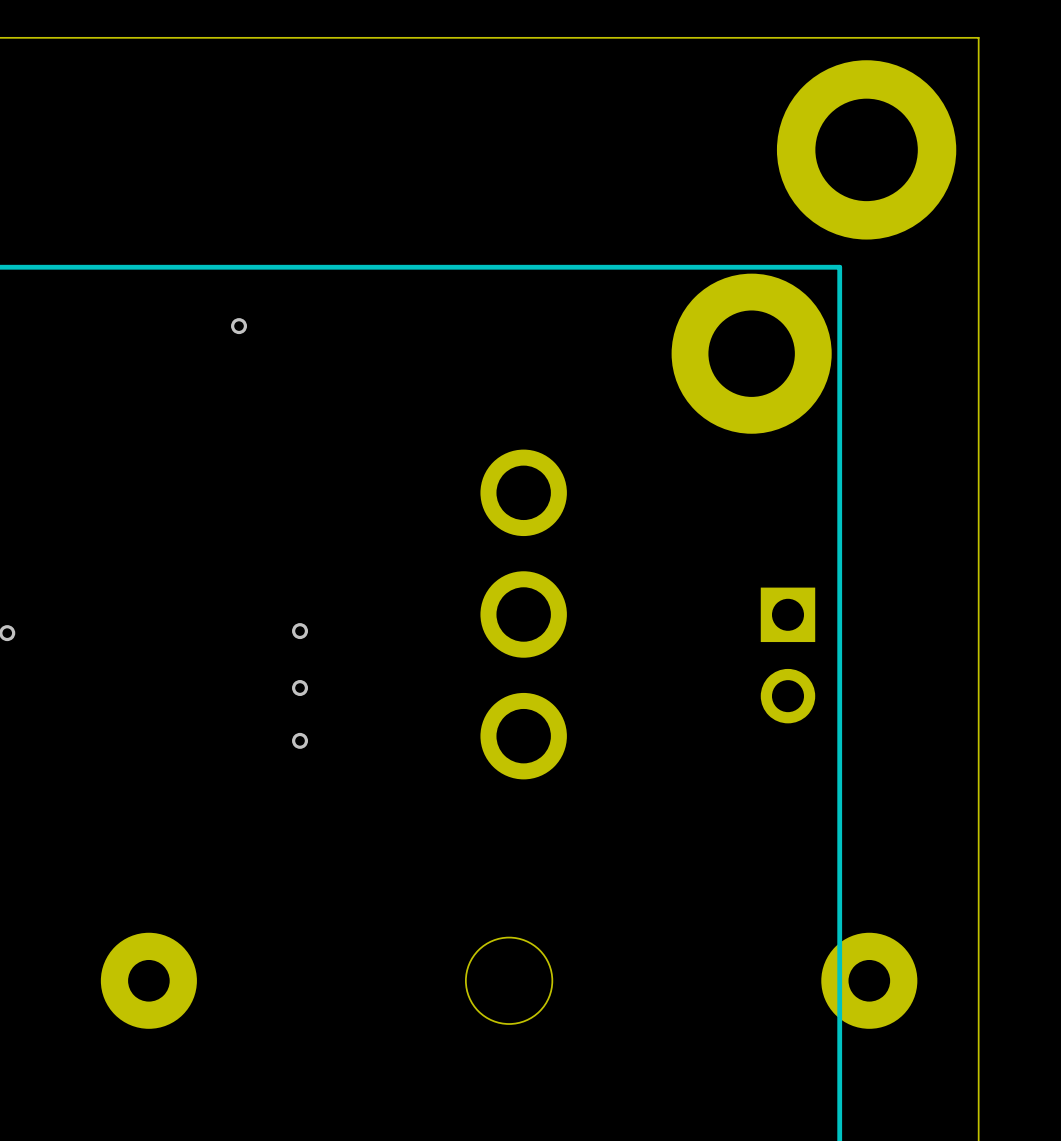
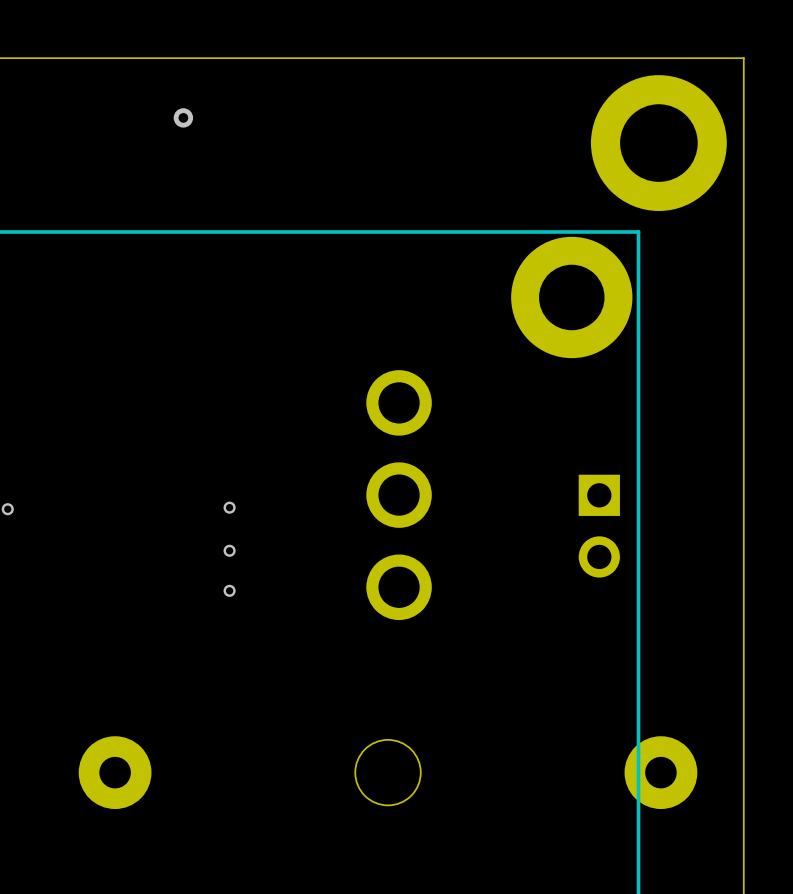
via: none -> (183, 117)
via: (239, 326) -> none

